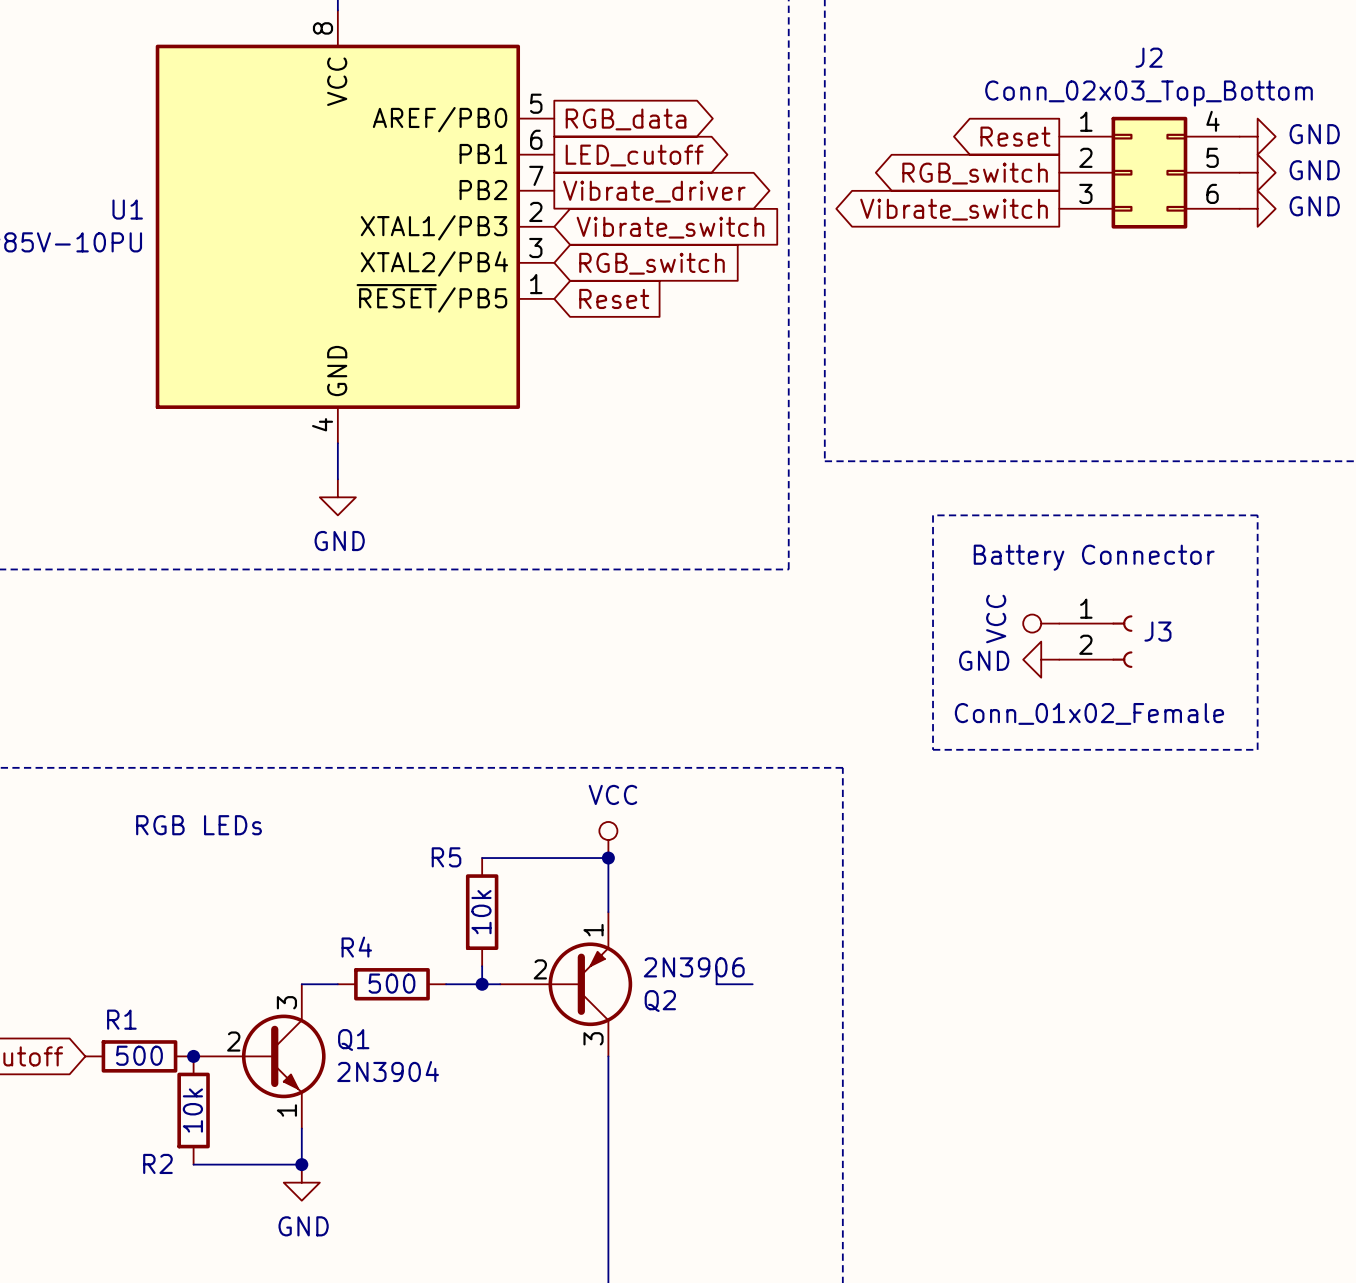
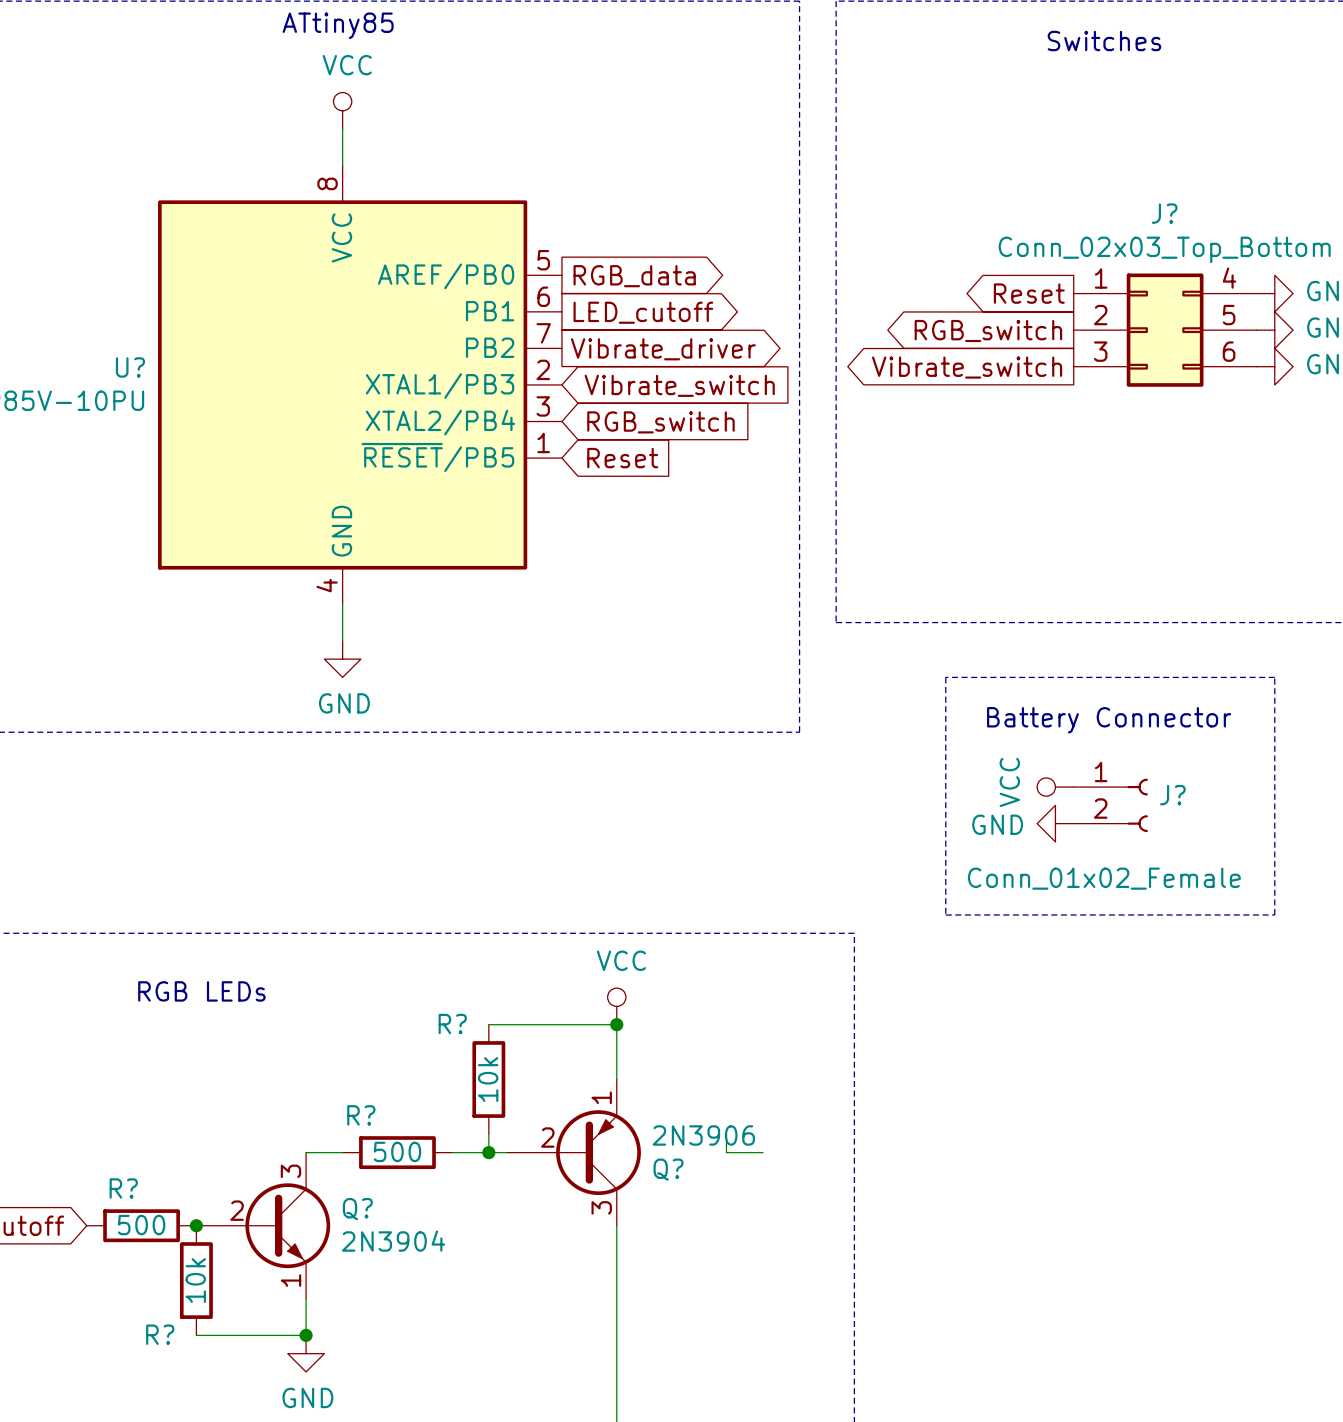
J2 name: J2 (1149, 57) -> J? (1164, 213)
U1 name: U1 (127, 209) -> U? (130, 367)
J3 name: J3 (1157, 631) -> J? (1172, 795)
R5 name: R5 (446, 857) -> R? (452, 1023)
R4 name: R4 (356, 947) -> R? (361, 1115)
Q2 name: Q2 (660, 1001) -> Q? (668, 1169)
R1 name: R1 (121, 1019) -> R? (123, 1188)
Q1 name: Q1 (353, 1040) -> Q? (357, 1209)
R2 name: R2 (157, 1163) -> R? (160, 1334)

